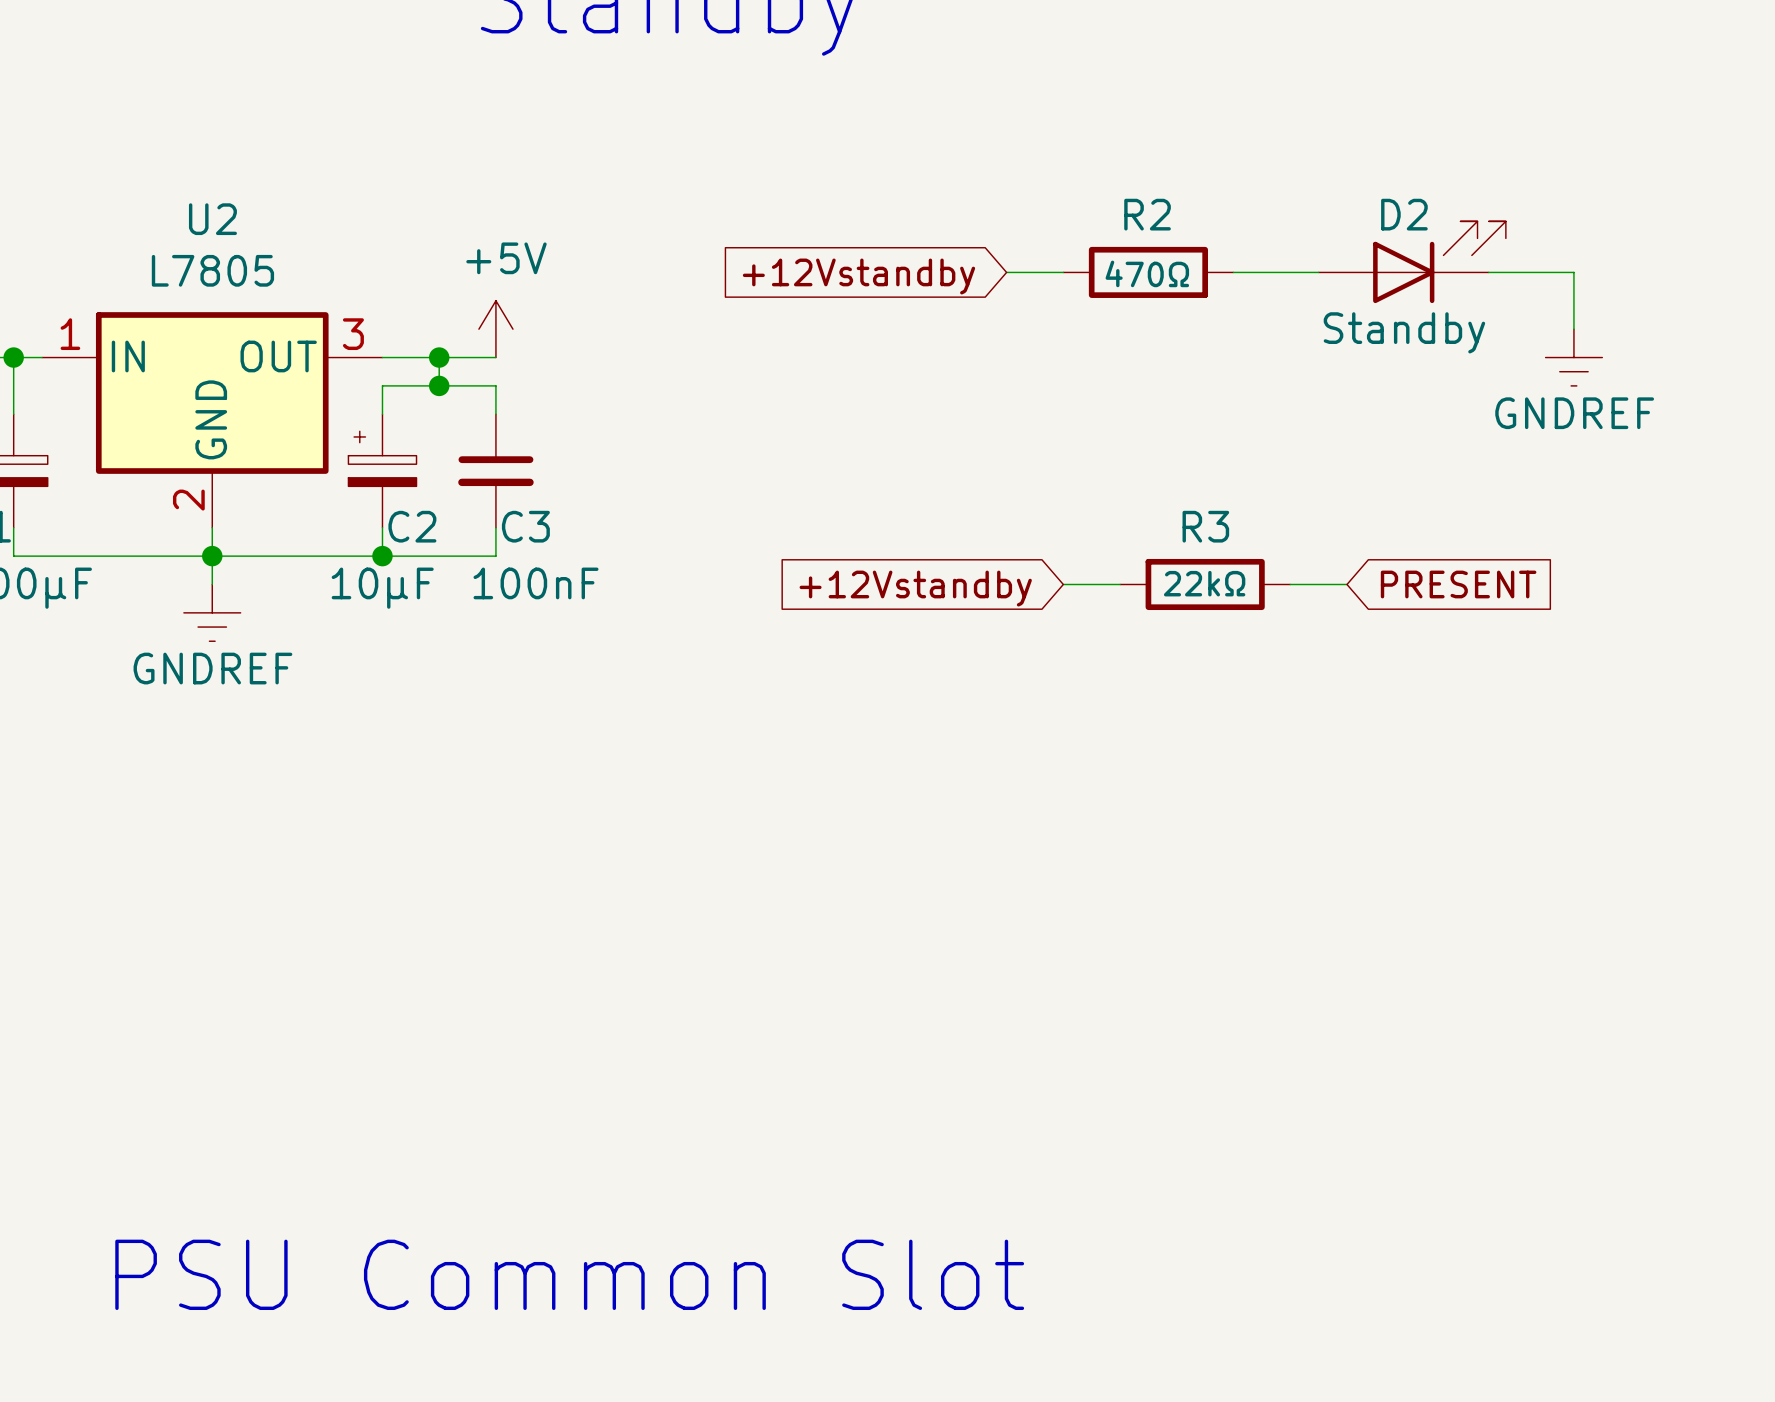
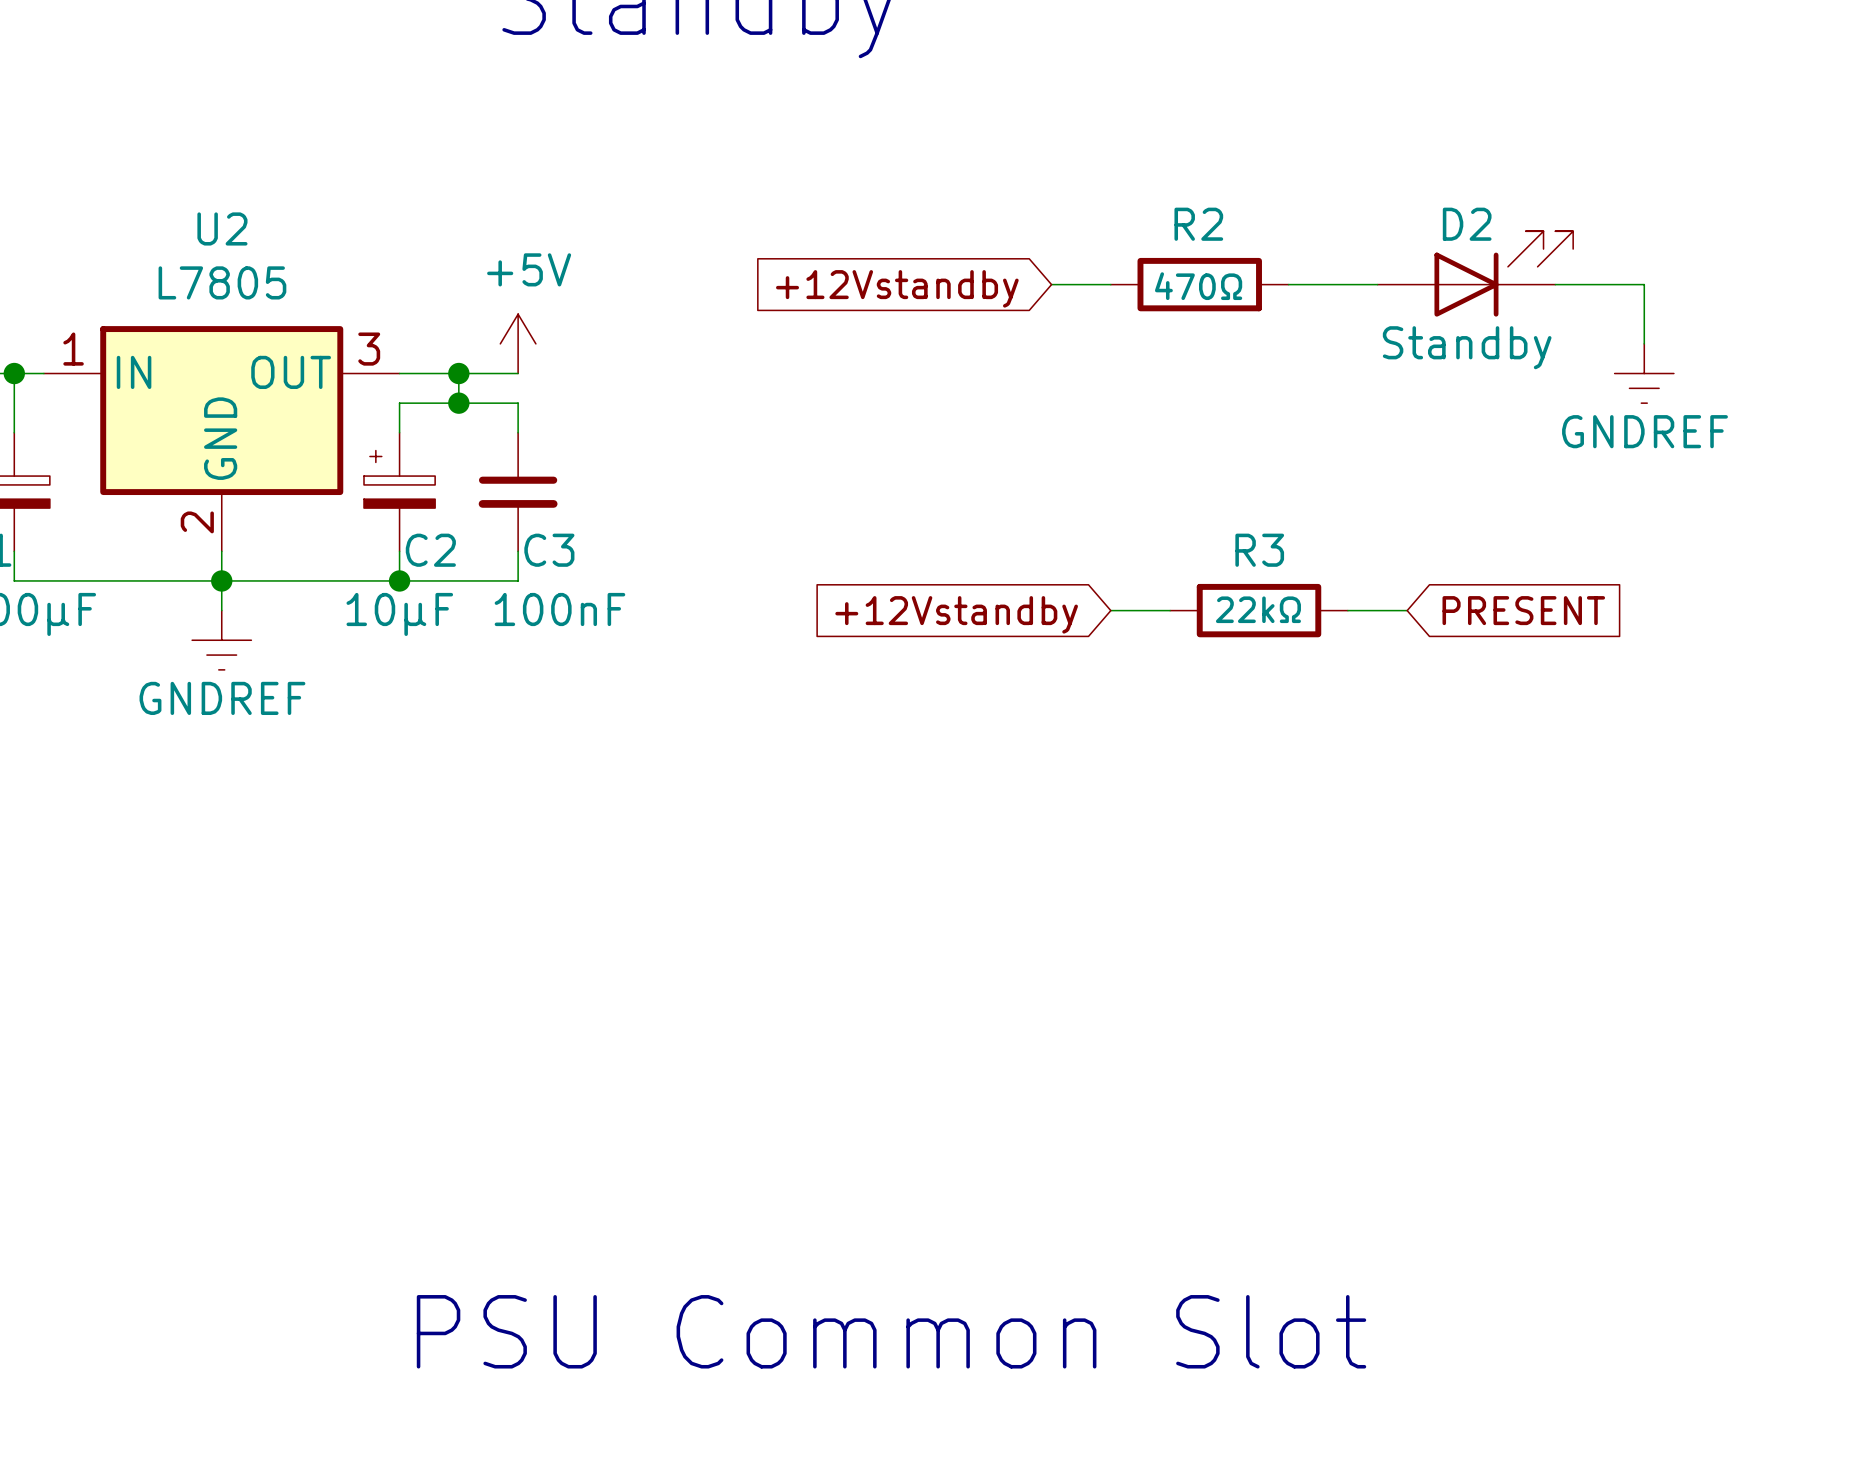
text position: PSU Common Slot (569, 1274) -> PSU Common Slot (891, 1331)

